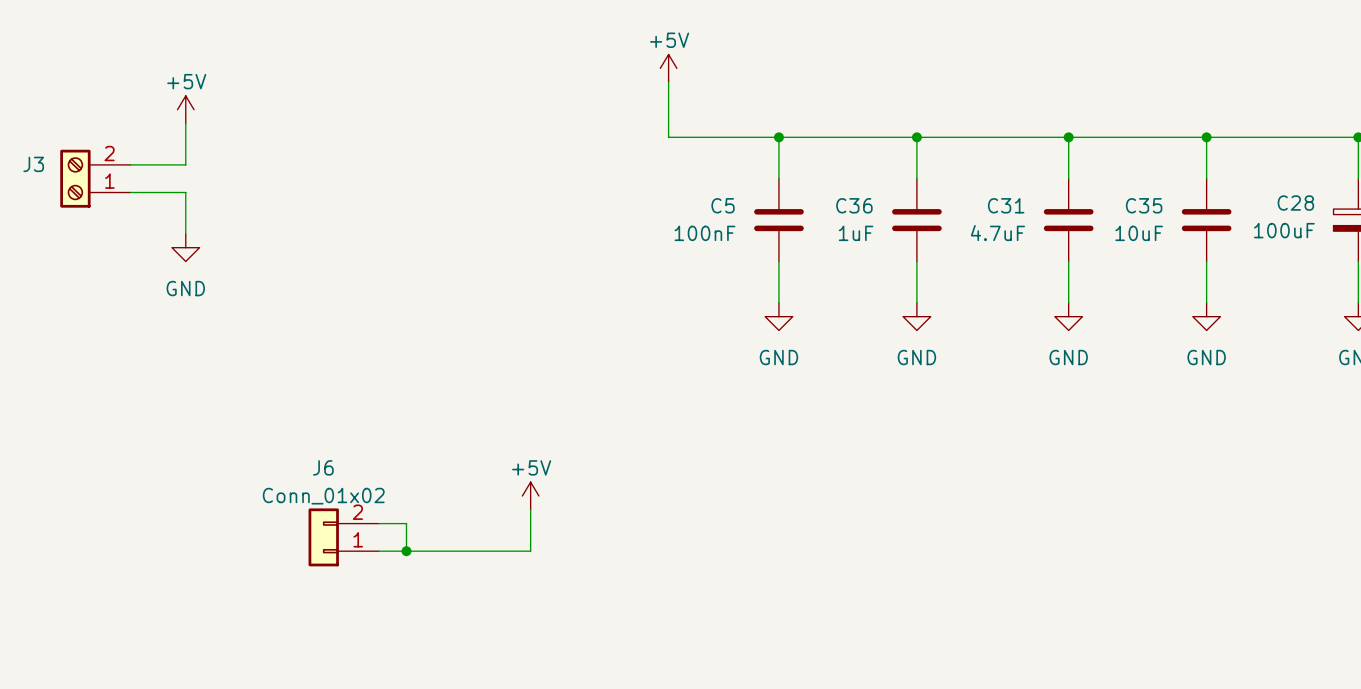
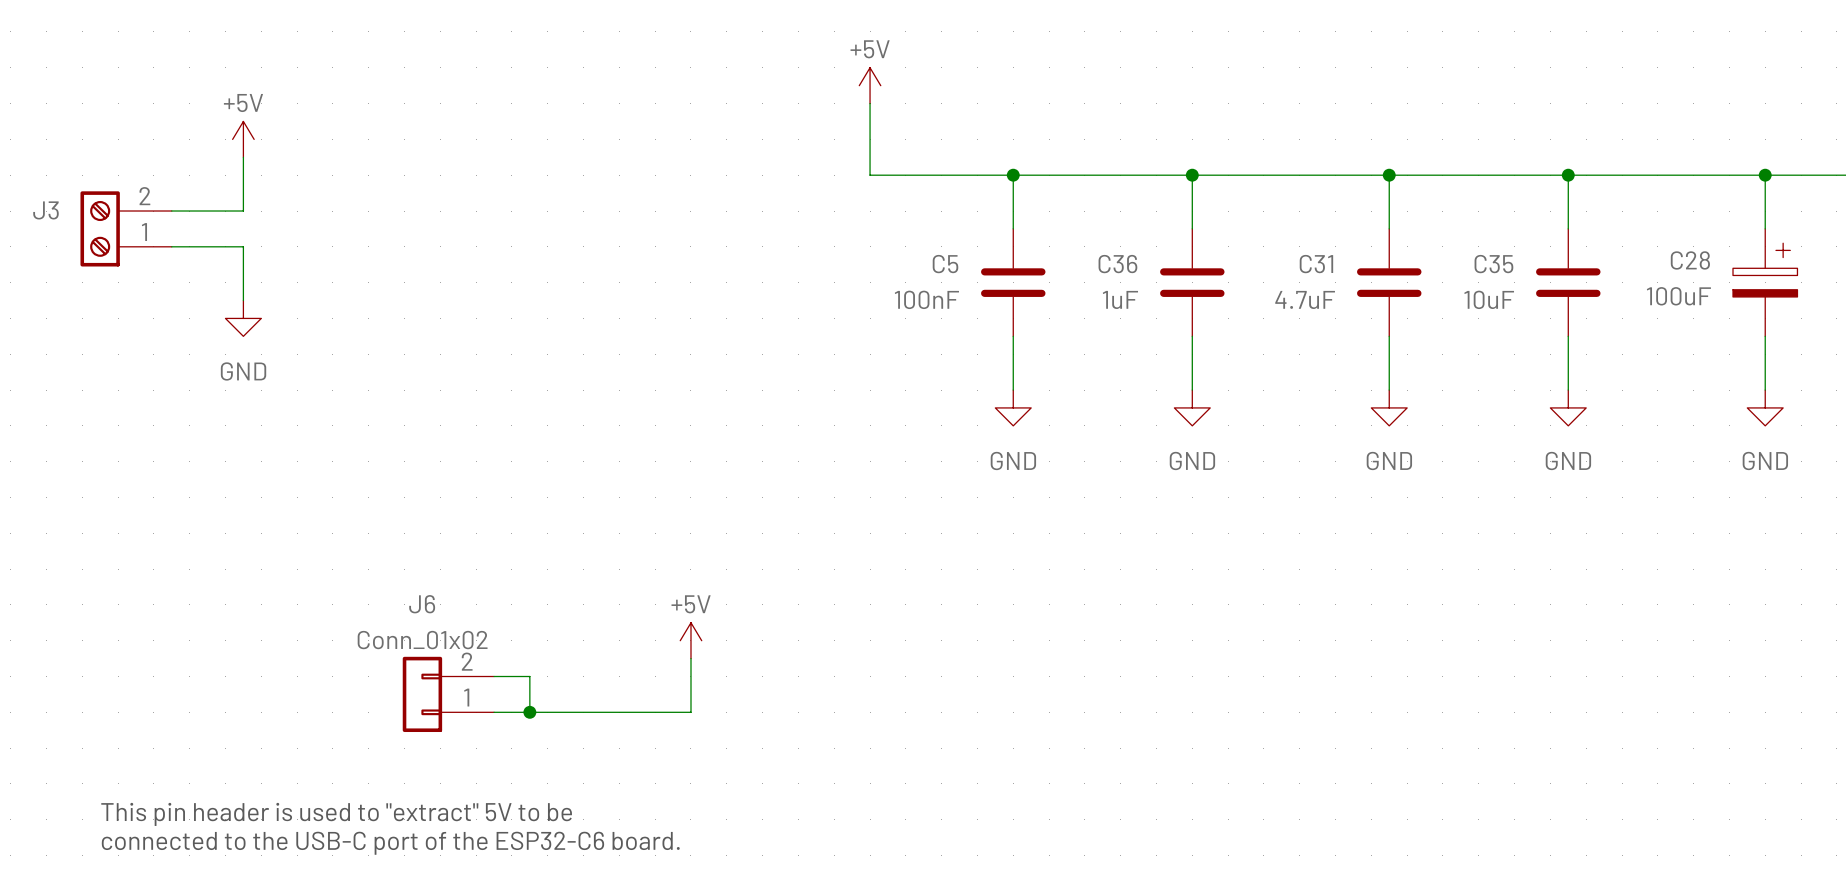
text: none -> This pin header is used to "extract" 5V to be (336, 814)
text: none -> connected to the USB-C port of the ESP32-C6 board. (390, 843)

